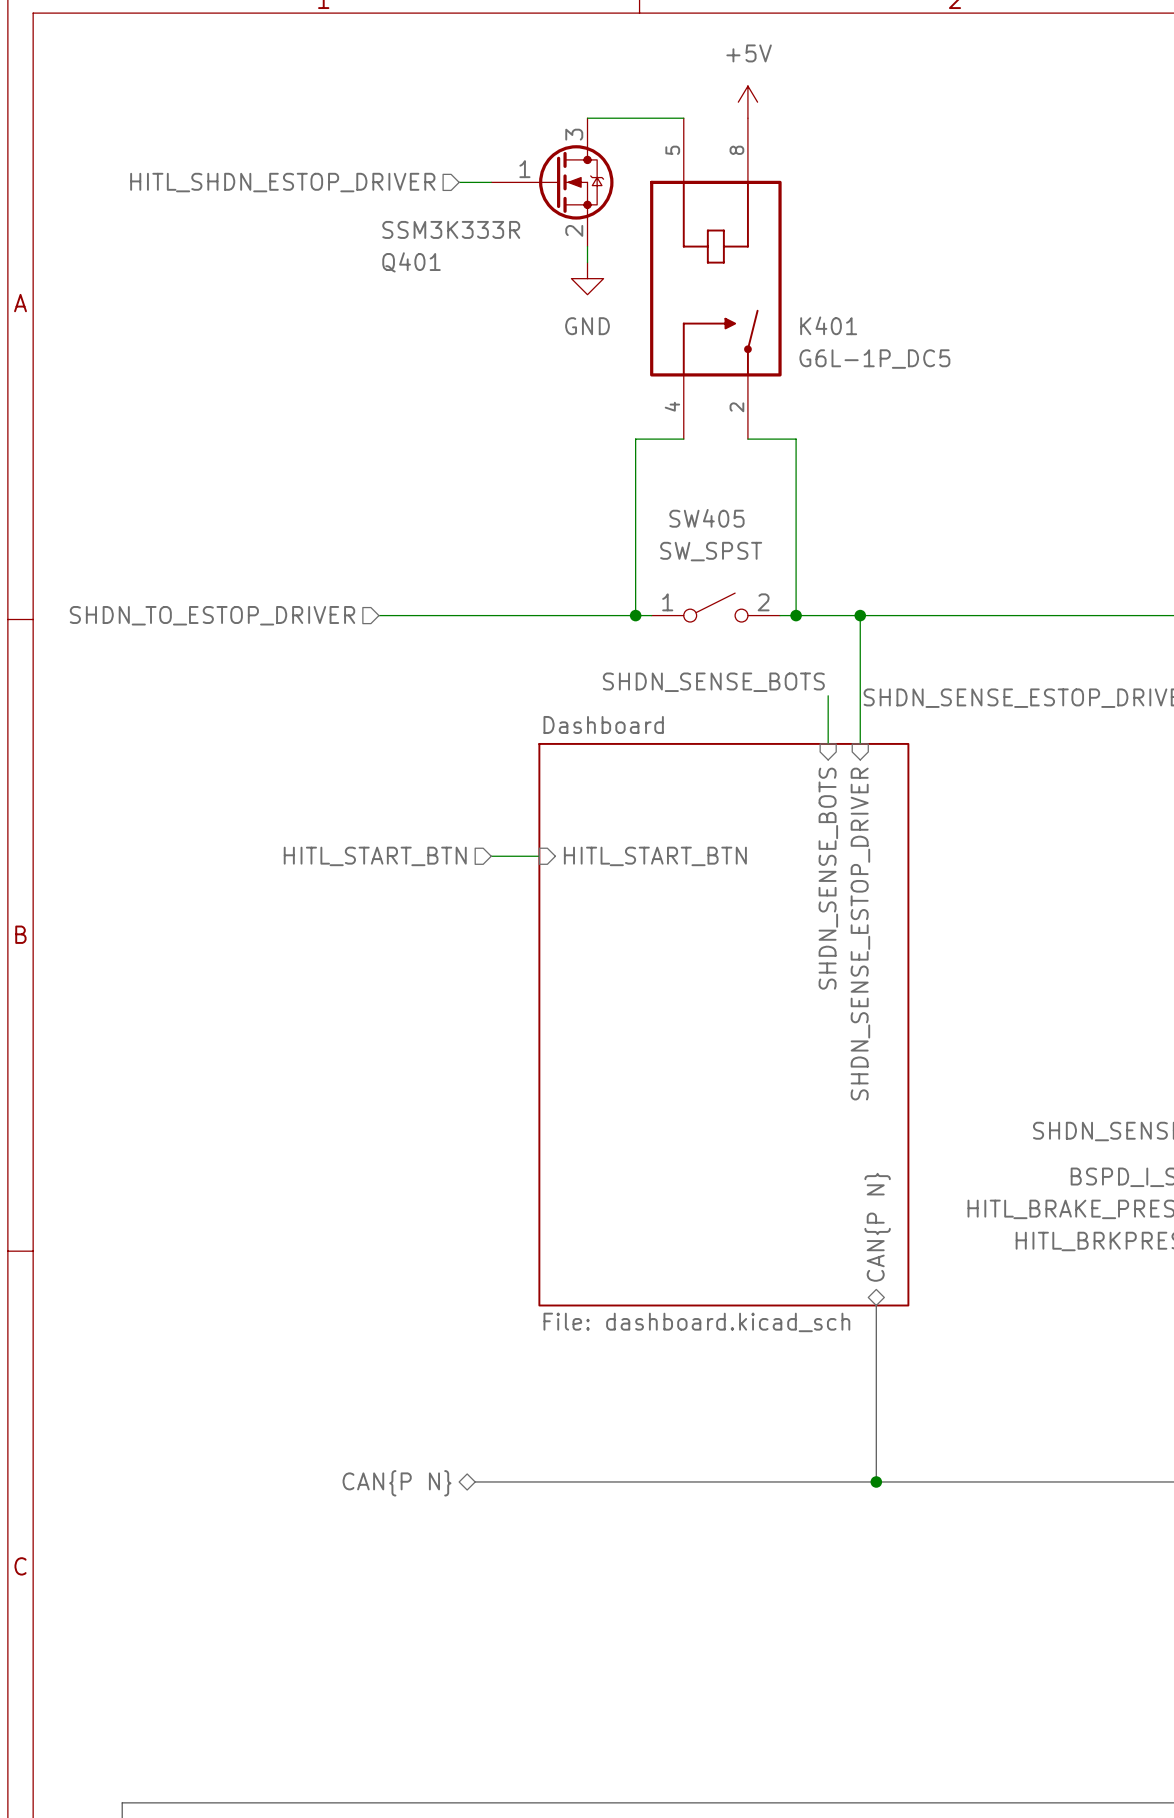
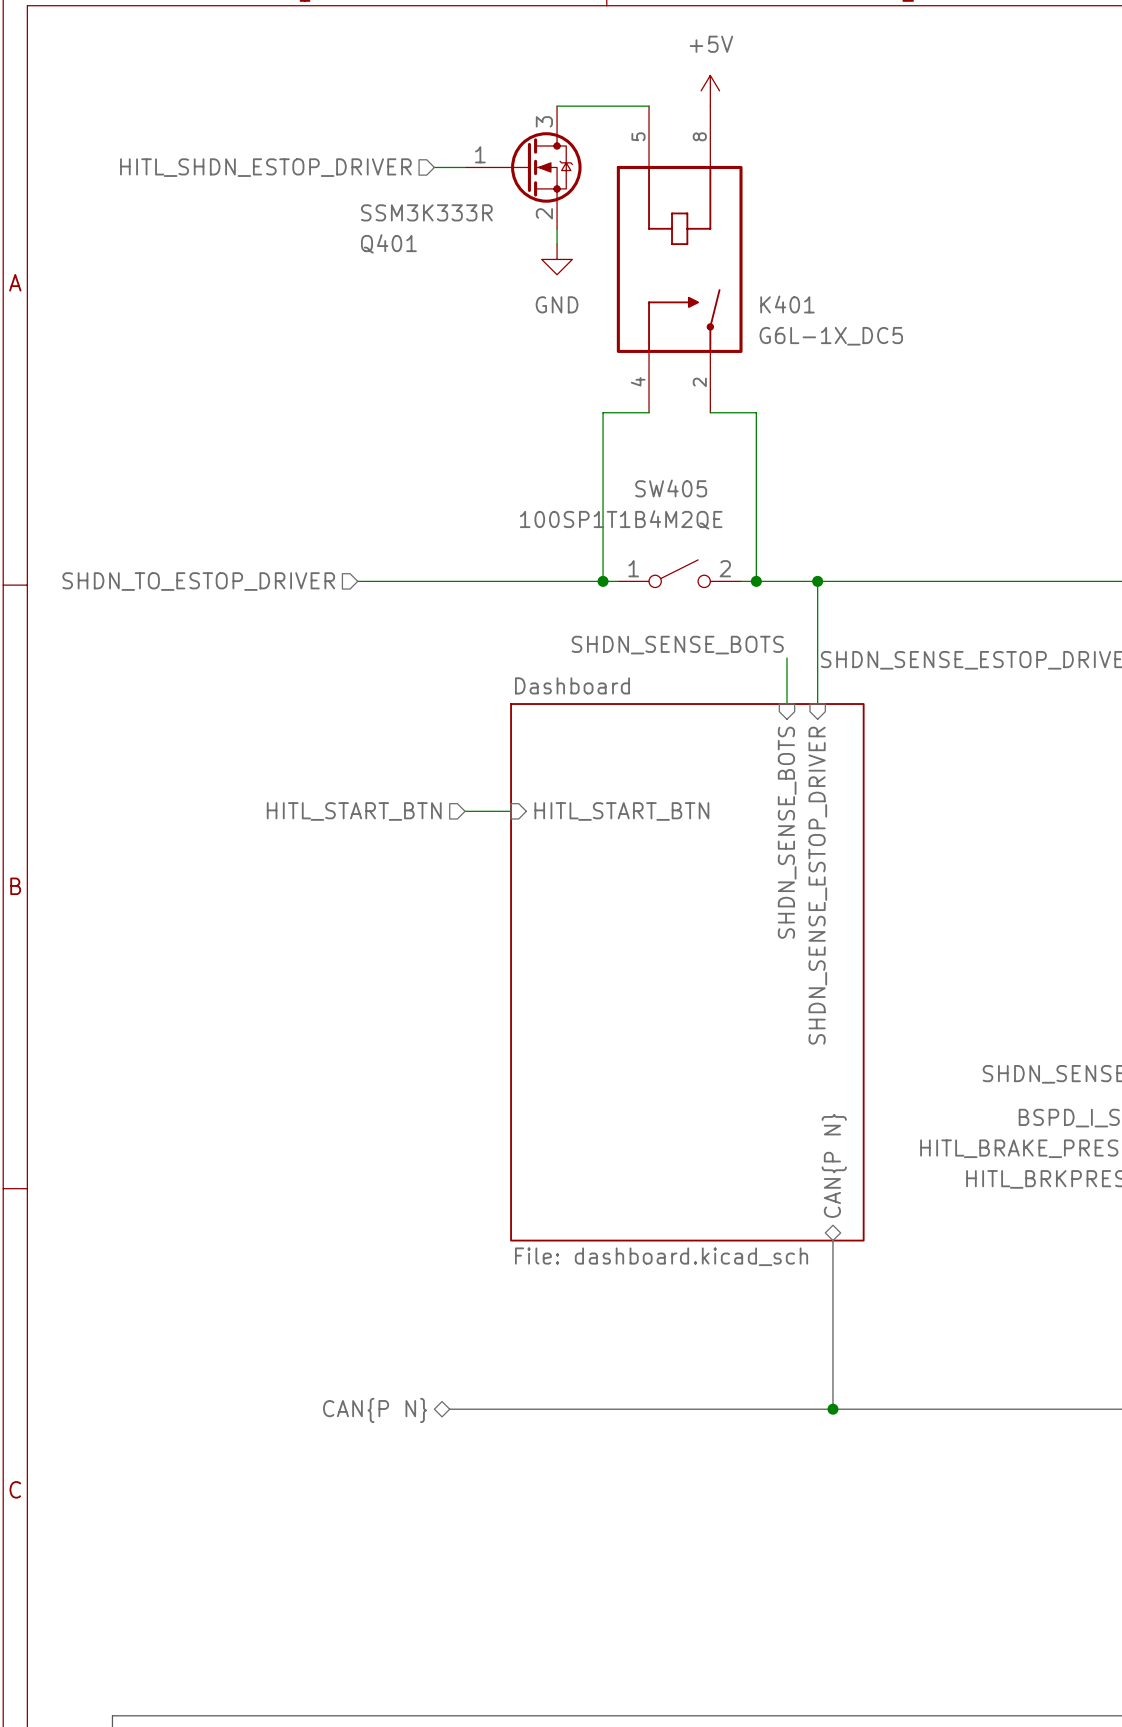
Q401 symbol: [491, 118, 614, 247] -> [465, 106, 582, 229]
K401 value: G6L-1P_DC5 (874, 359) -> G6L-1X_DC5 (831, 336)
SW405 value: SW_SPST (711, 551) -> 100SP1T1B4M2QE (621, 519)

